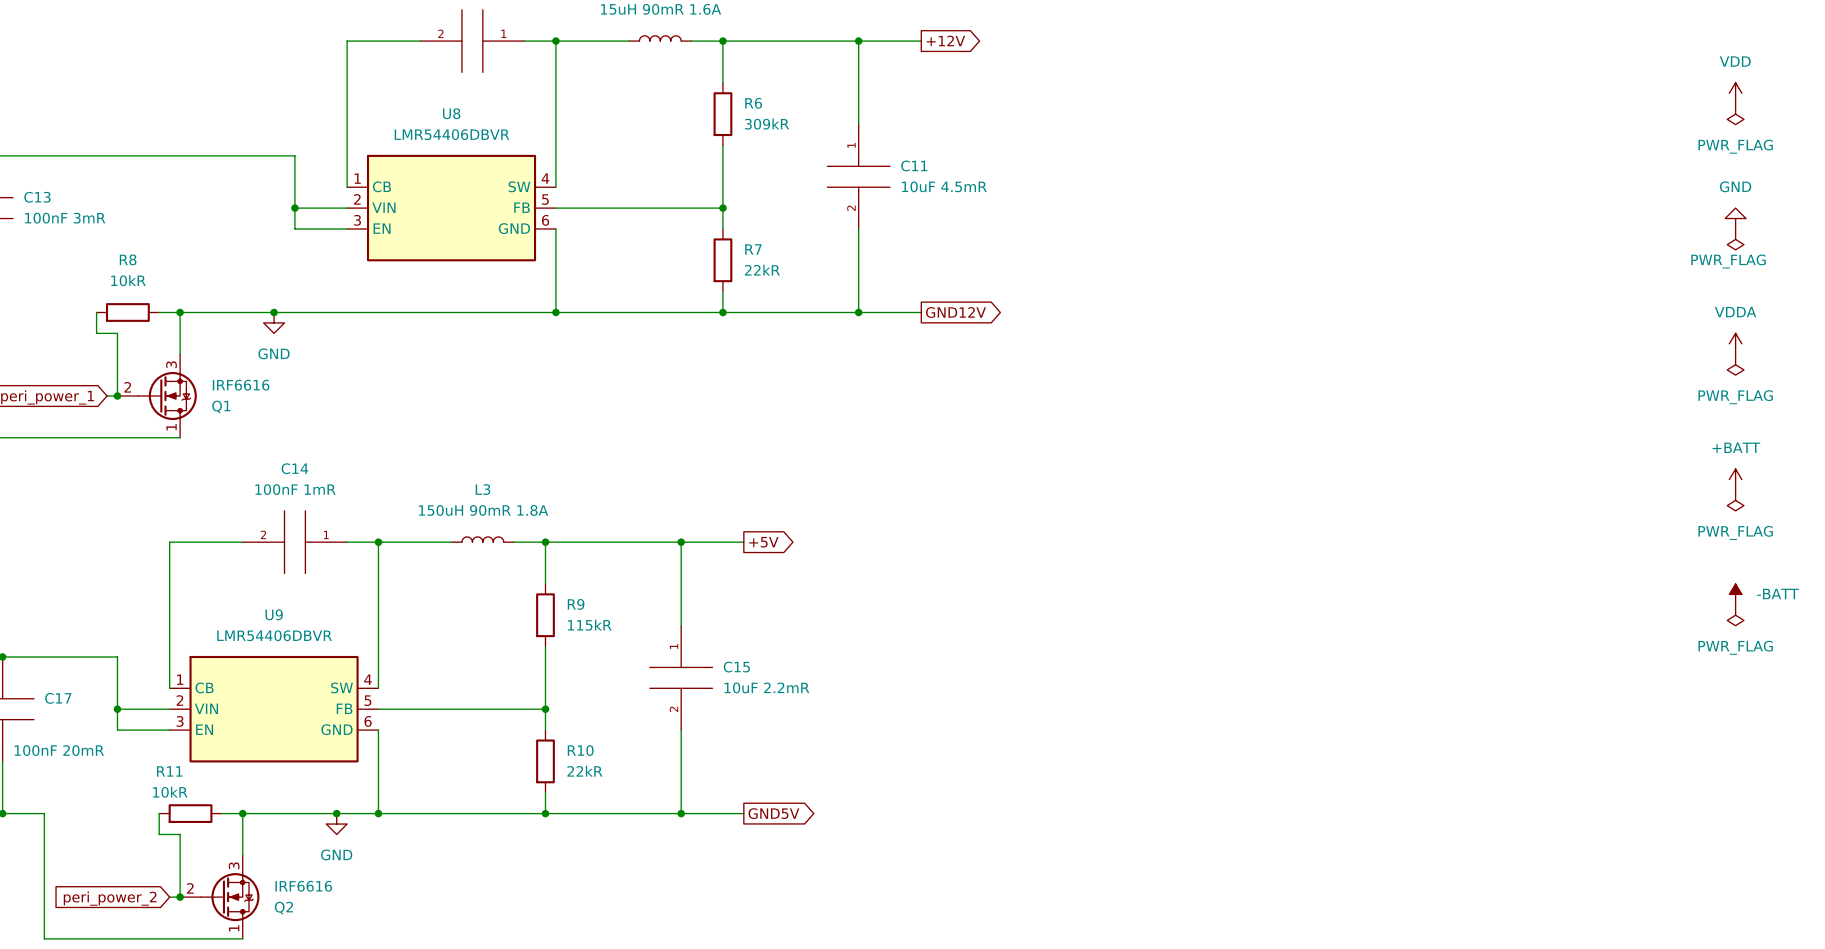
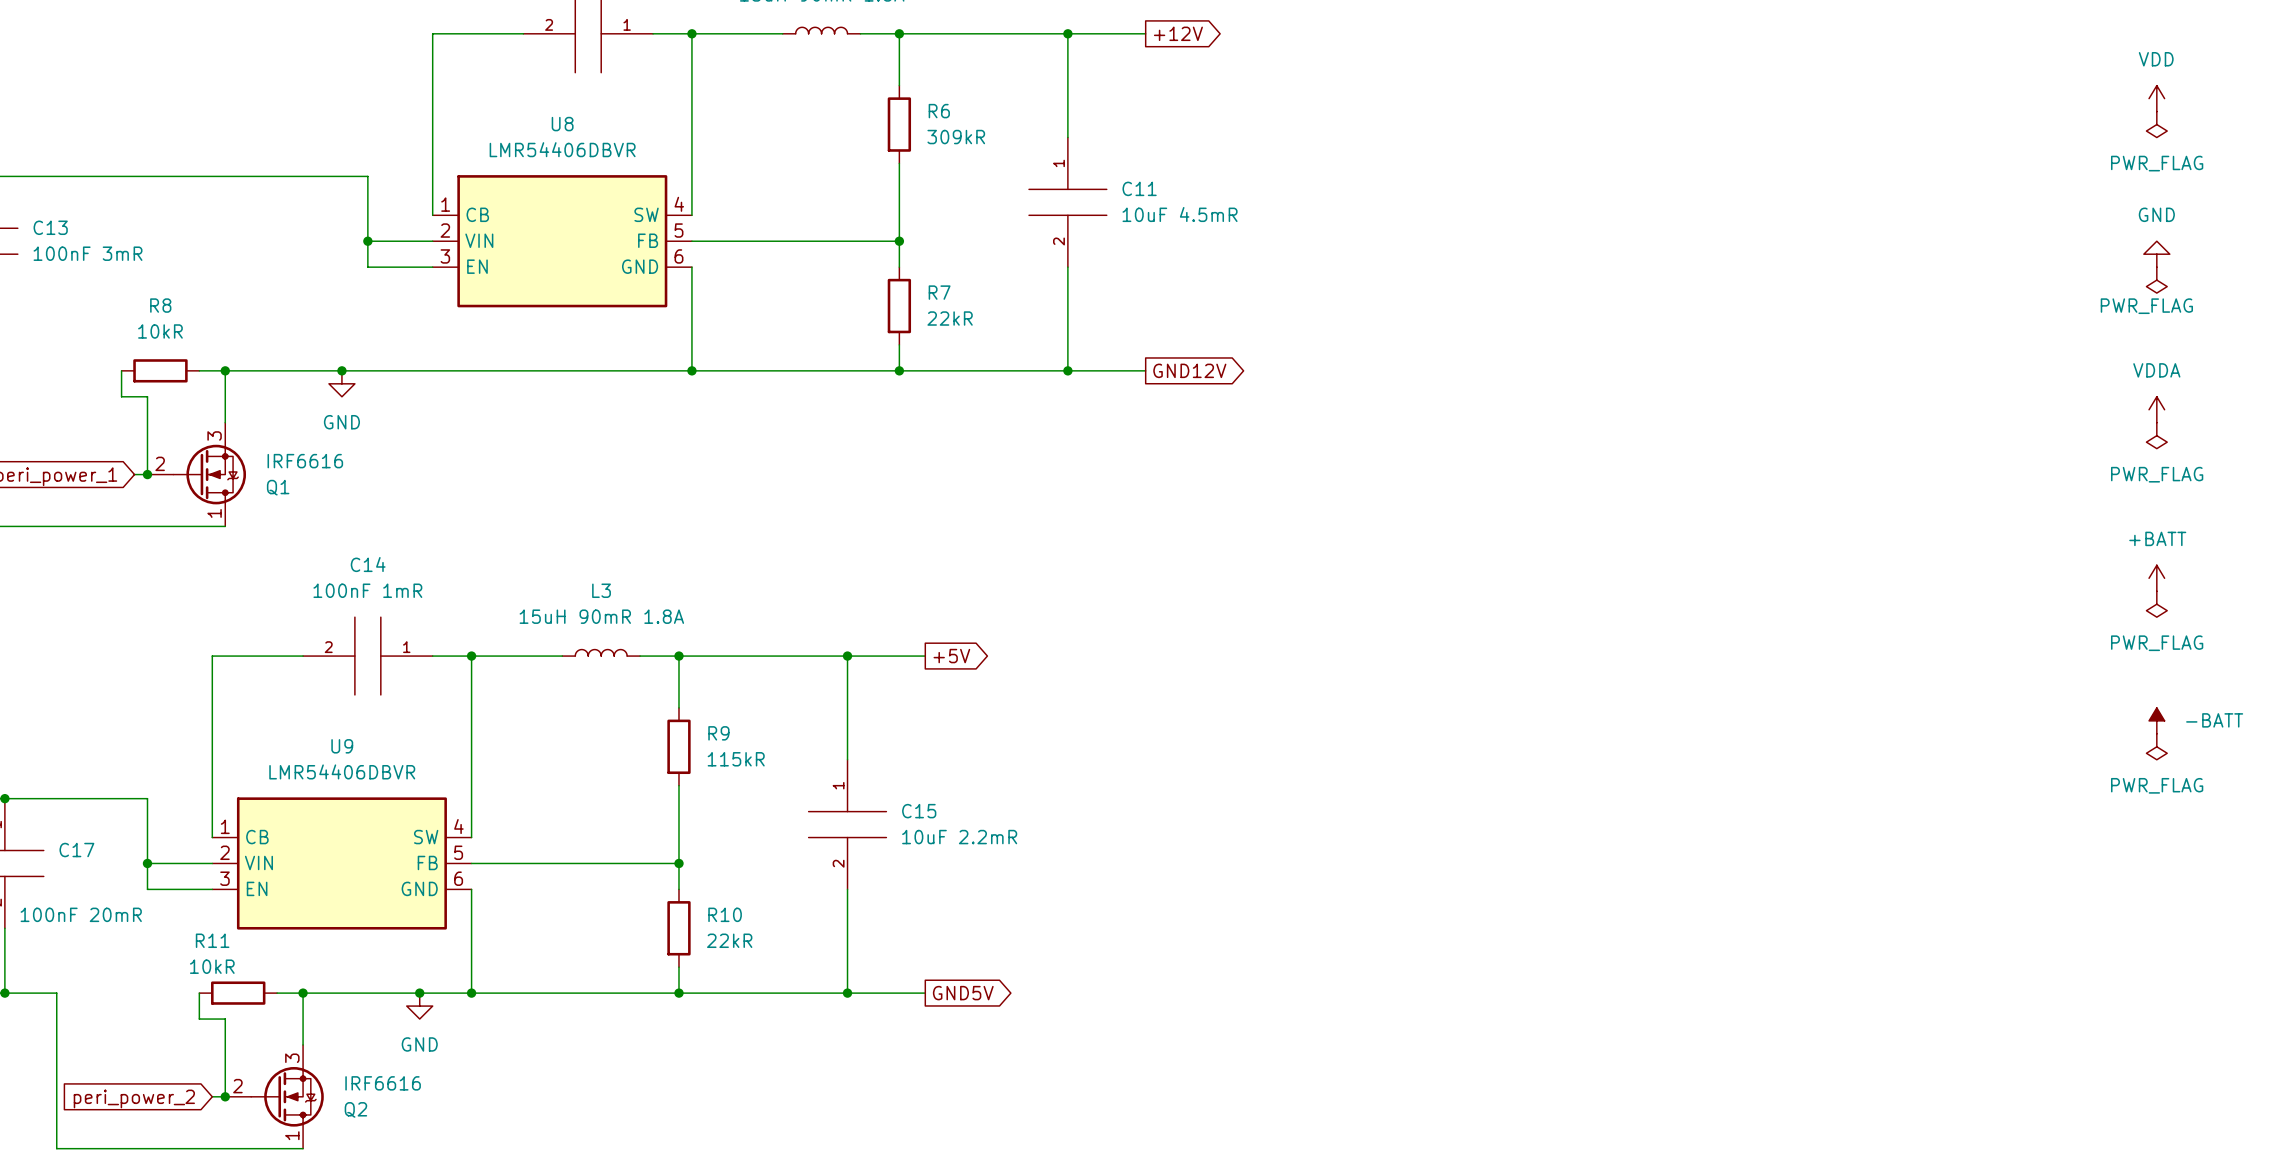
L3 value: 150uH 90mR 1.8A (483, 510) -> 15uH 90mR 1.8A (601, 616)

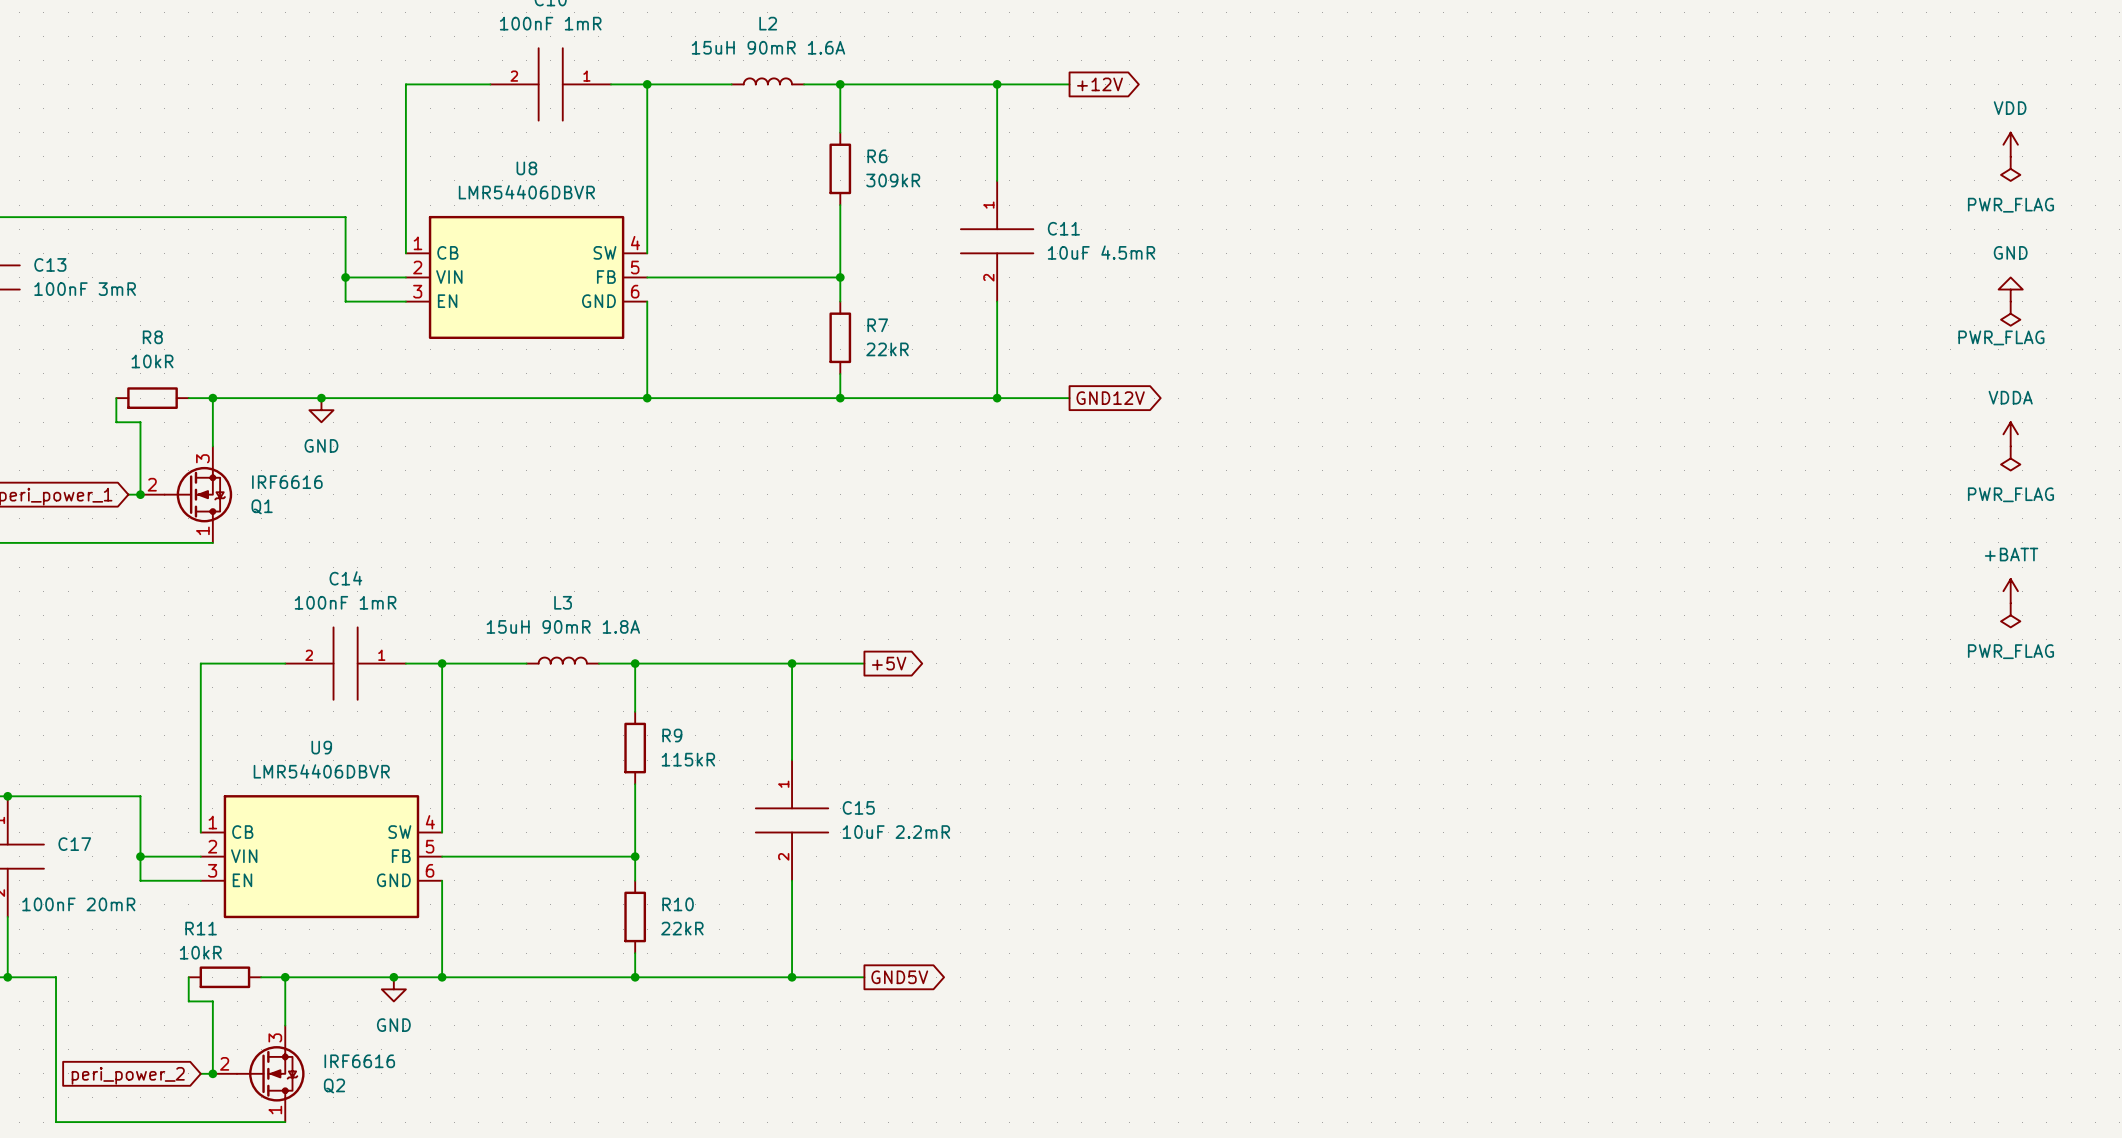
power symbol: -BATT (2156, 720) -> none
power symbol: PWR_FLAG (2156, 746) -> none

